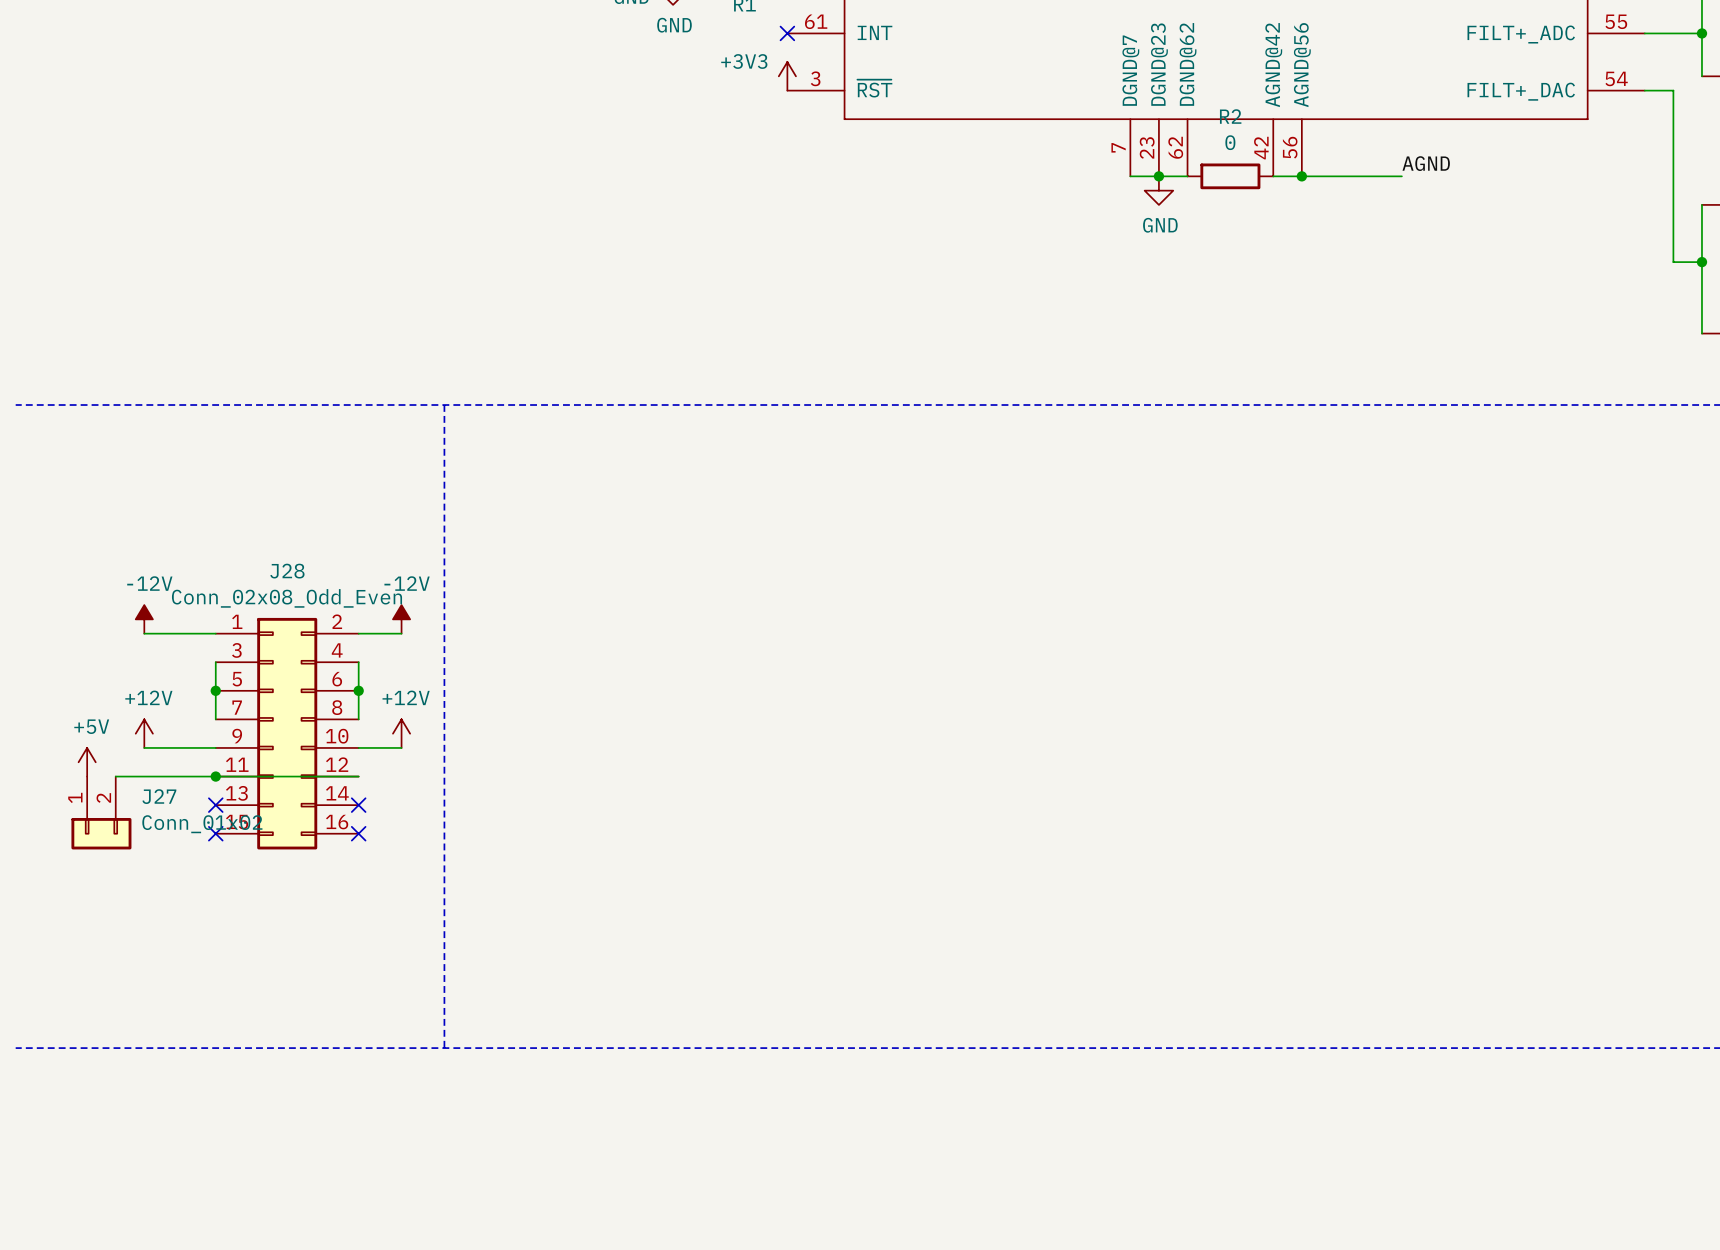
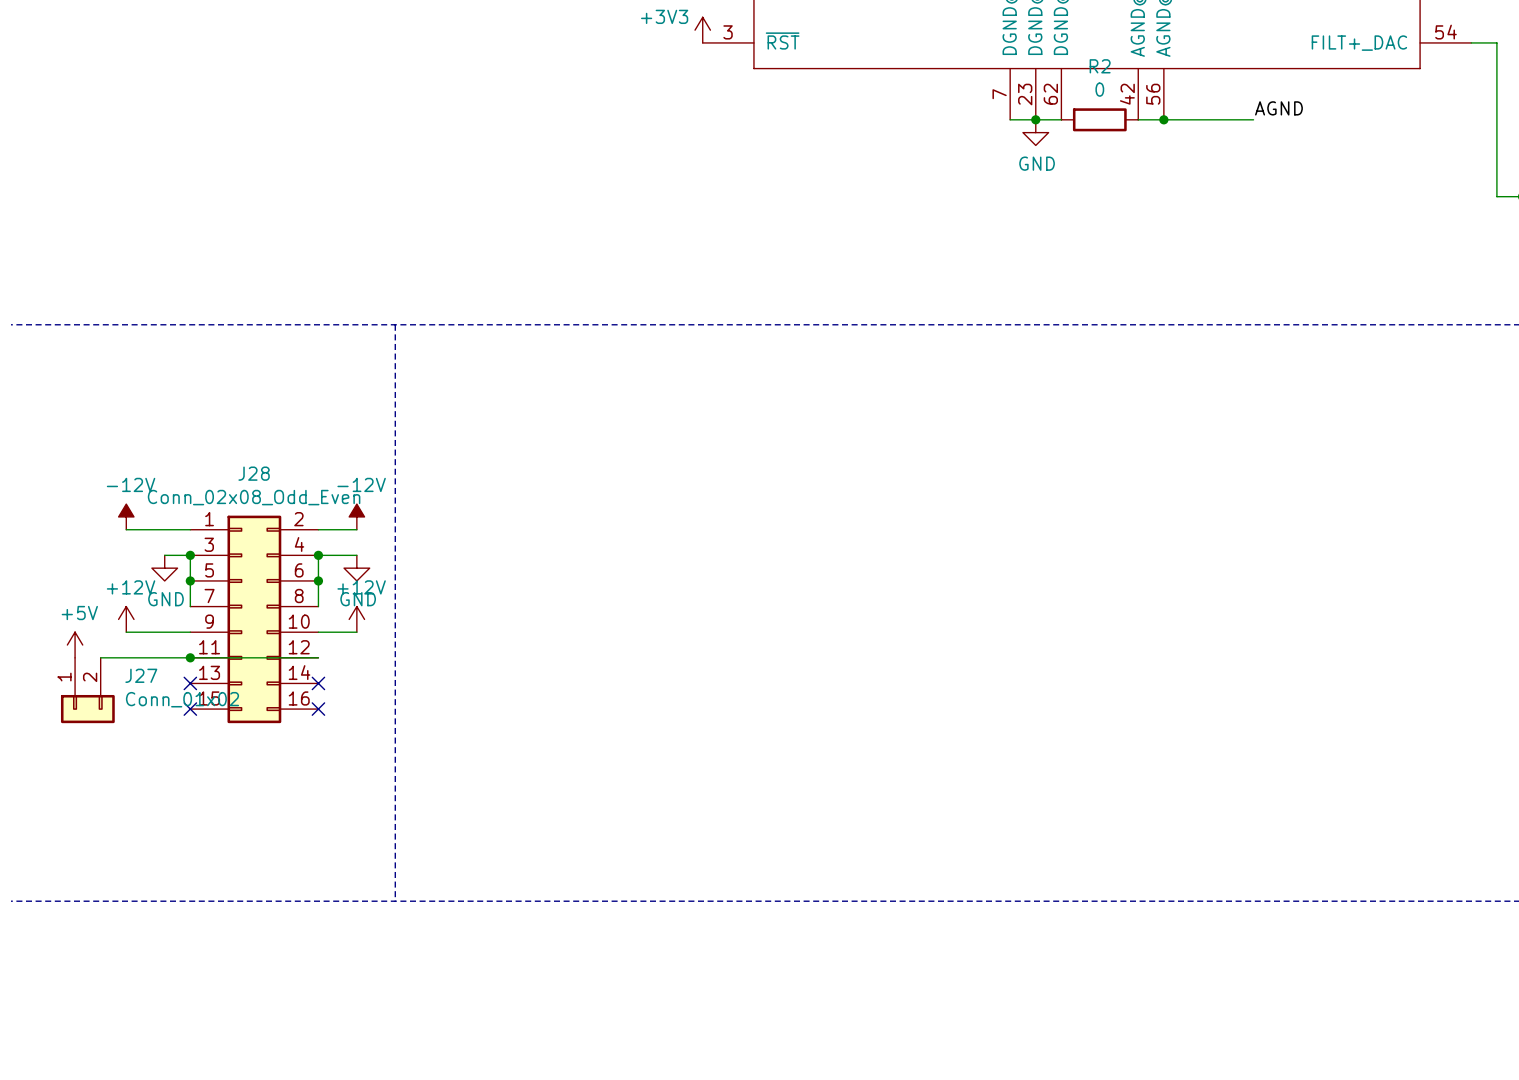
wire: none -> (164, 555) (190, 555)
junction: none -> (190, 555)
wire: none -> (318, 555) (356, 555)
junction: none -> (318, 555)
power symbol: none -> GND (164, 568)
power symbol: none -> GND (356, 568)

